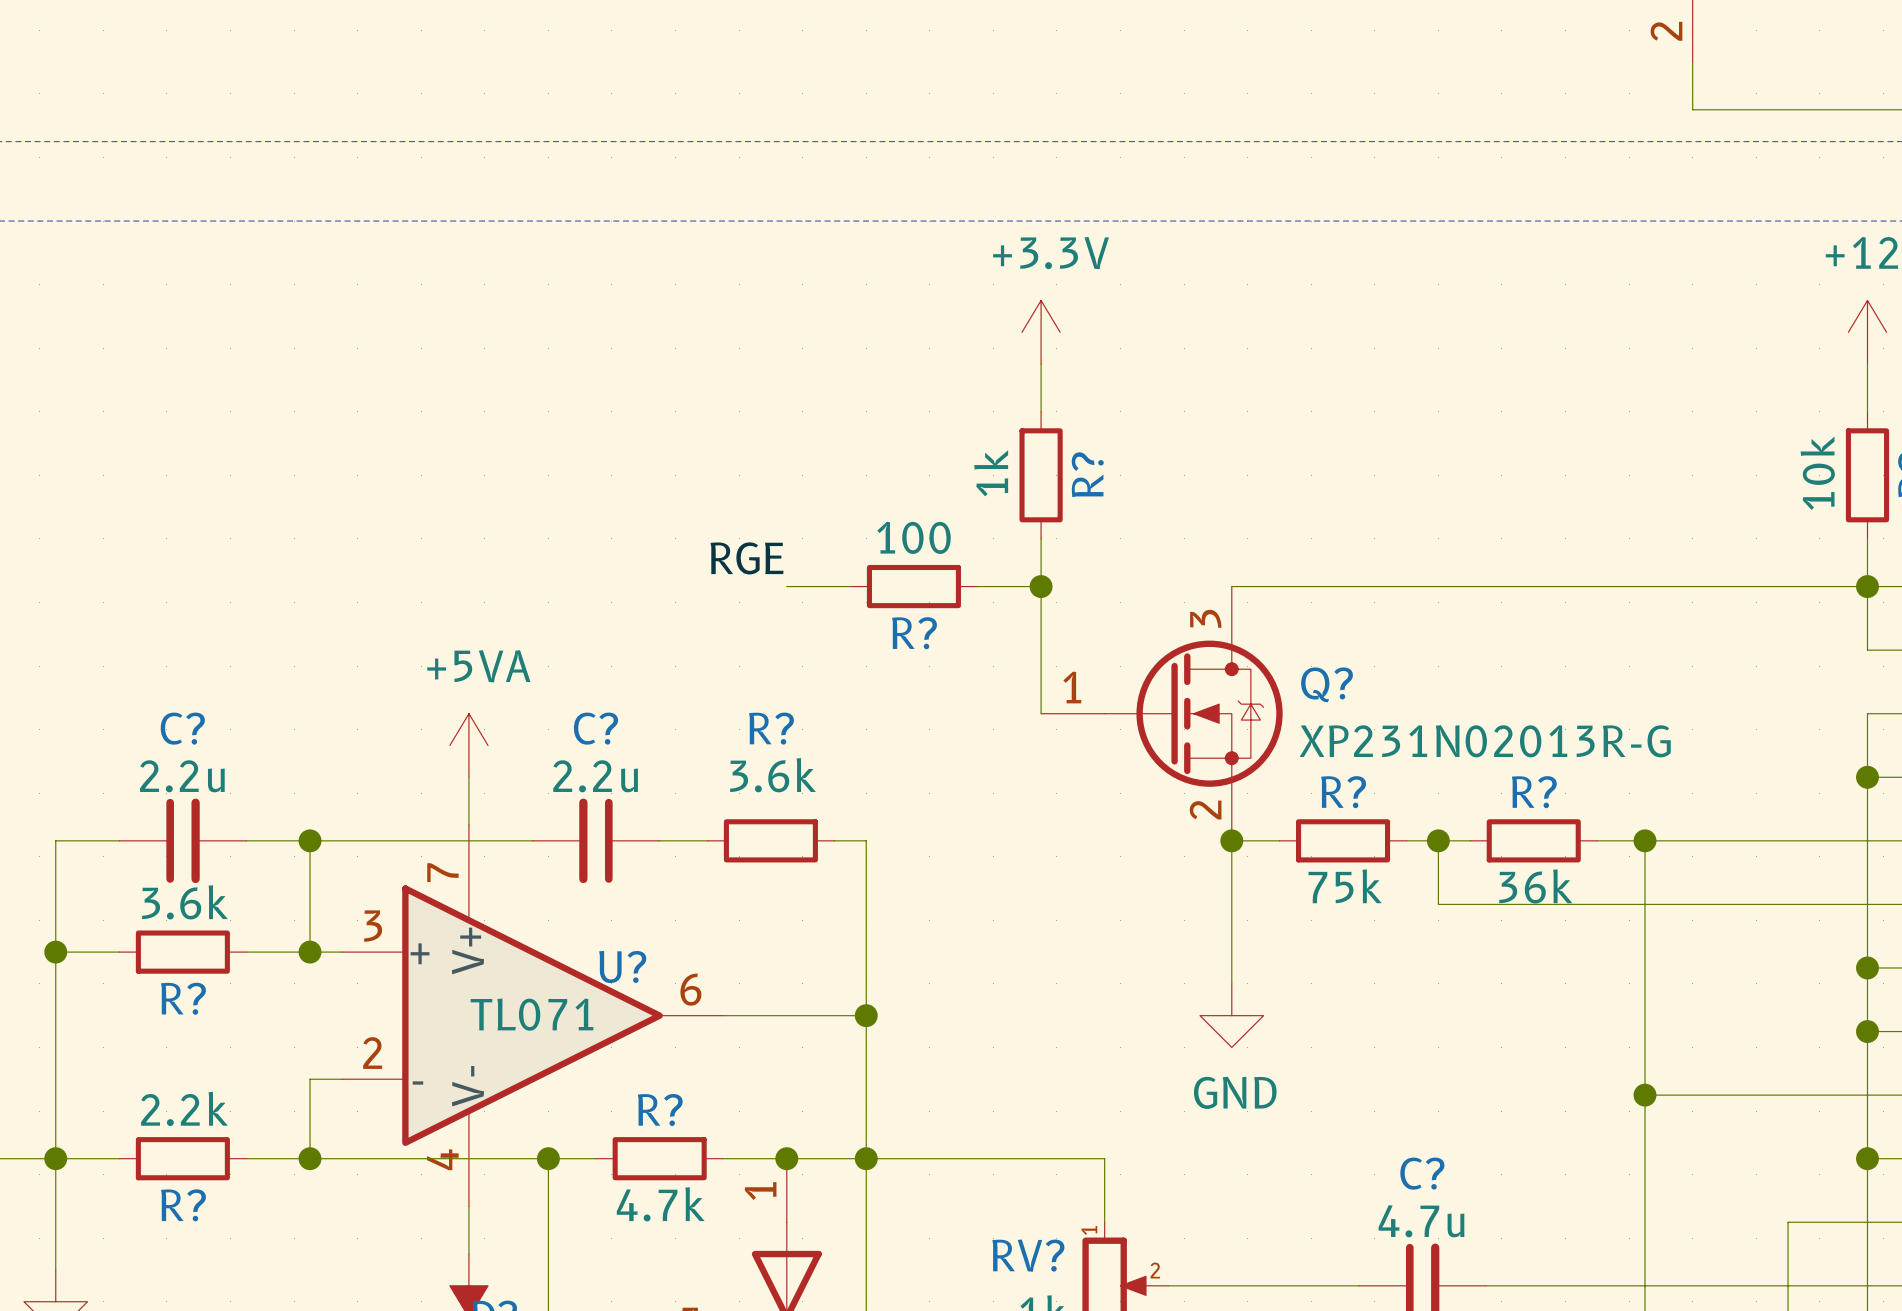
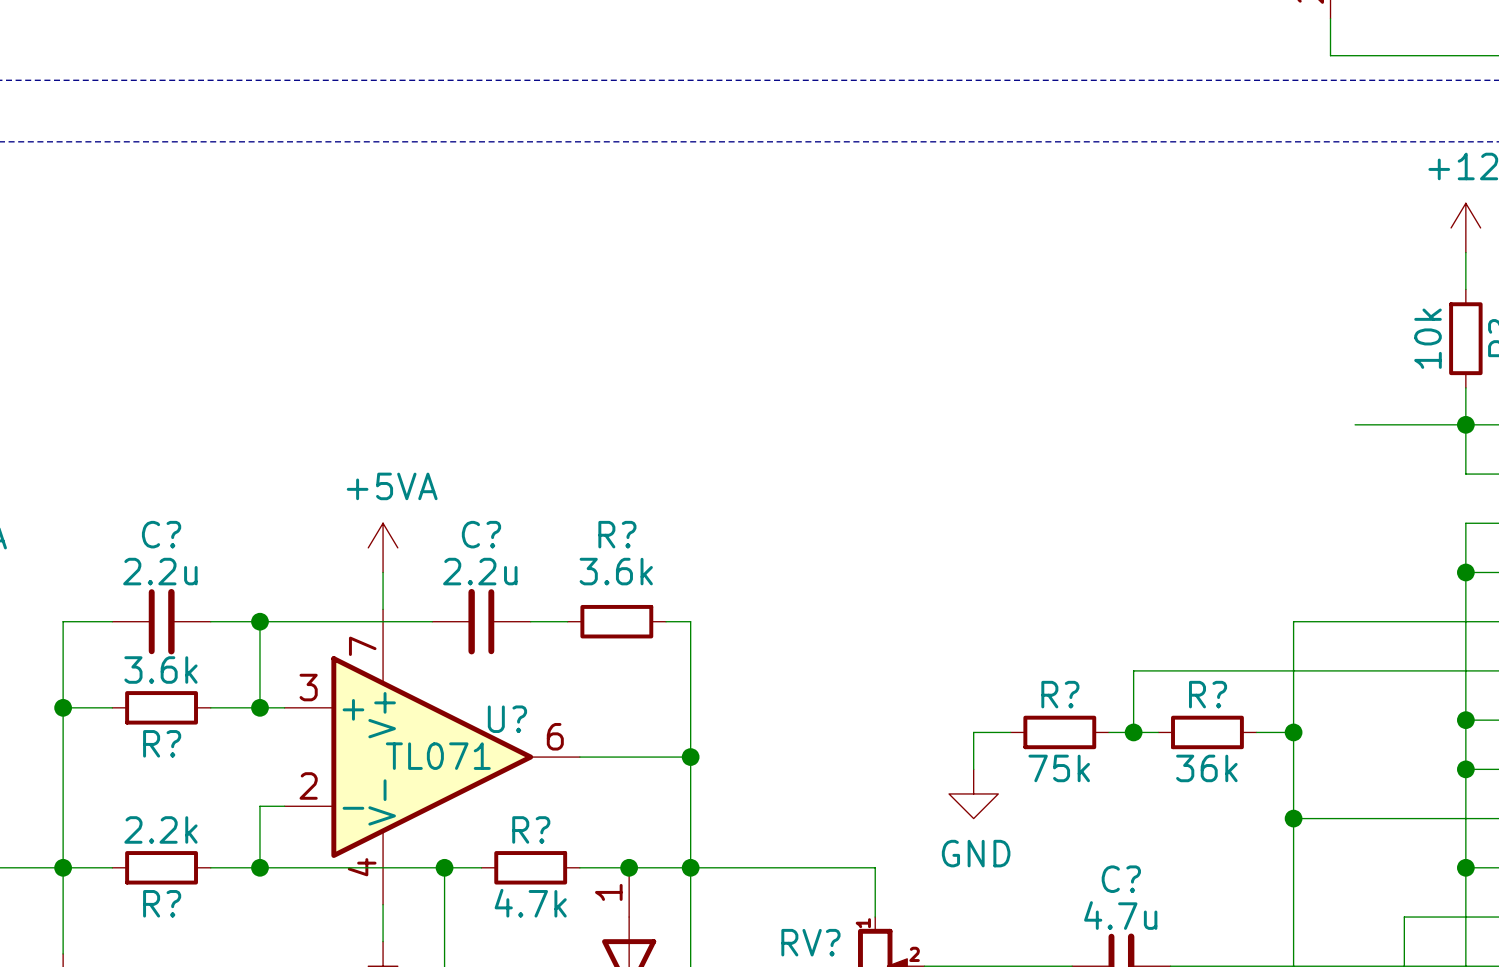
power symbol: +3.3V (1041, 332) -> none
wire: (1041, 364) (1041, 411) -> none
R?: 1k (1041, 475) -> none
wire: (1041, 538) (1041, 713) -> none
label: RGE (747, 558) -> none
wire: (786, 586) (850, 586) -> none
R?: 100 (913, 586) -> none
wire: (977, 586) (1041, 586) -> none
junction: (1041, 586) -> none
wire: (1231, 586) (1724, 586) -> none
Q?: XP231N02013R-G (1161, 713) -> none
junction: (1231, 840) -> none
wire: (1279, 840) (1231, 840) (1231, 983) -> none
R? position: (1343, 840) -> (1059, 732)
wire: (1406, 840) (1470, 840) -> (1109, 732) (1158, 732)
wire: (1438, 840) (1438, 904) -> (1133, 732) (1133, 670)
junction: (1438, 840) -> none
R? position: (1533, 840) -> (1207, 732)
wire: (1597, 840) (1644, 840) -> (1256, 732) (1293, 732)
junction: (1644, 840) -> none
wire: none -> (1010, 732) (973, 732) (973, 769)
junction: none -> (1133, 732)
junction: none -> (1293, 732)
power symbol position: GND (1231, 1015) -> GND (973, 793)

